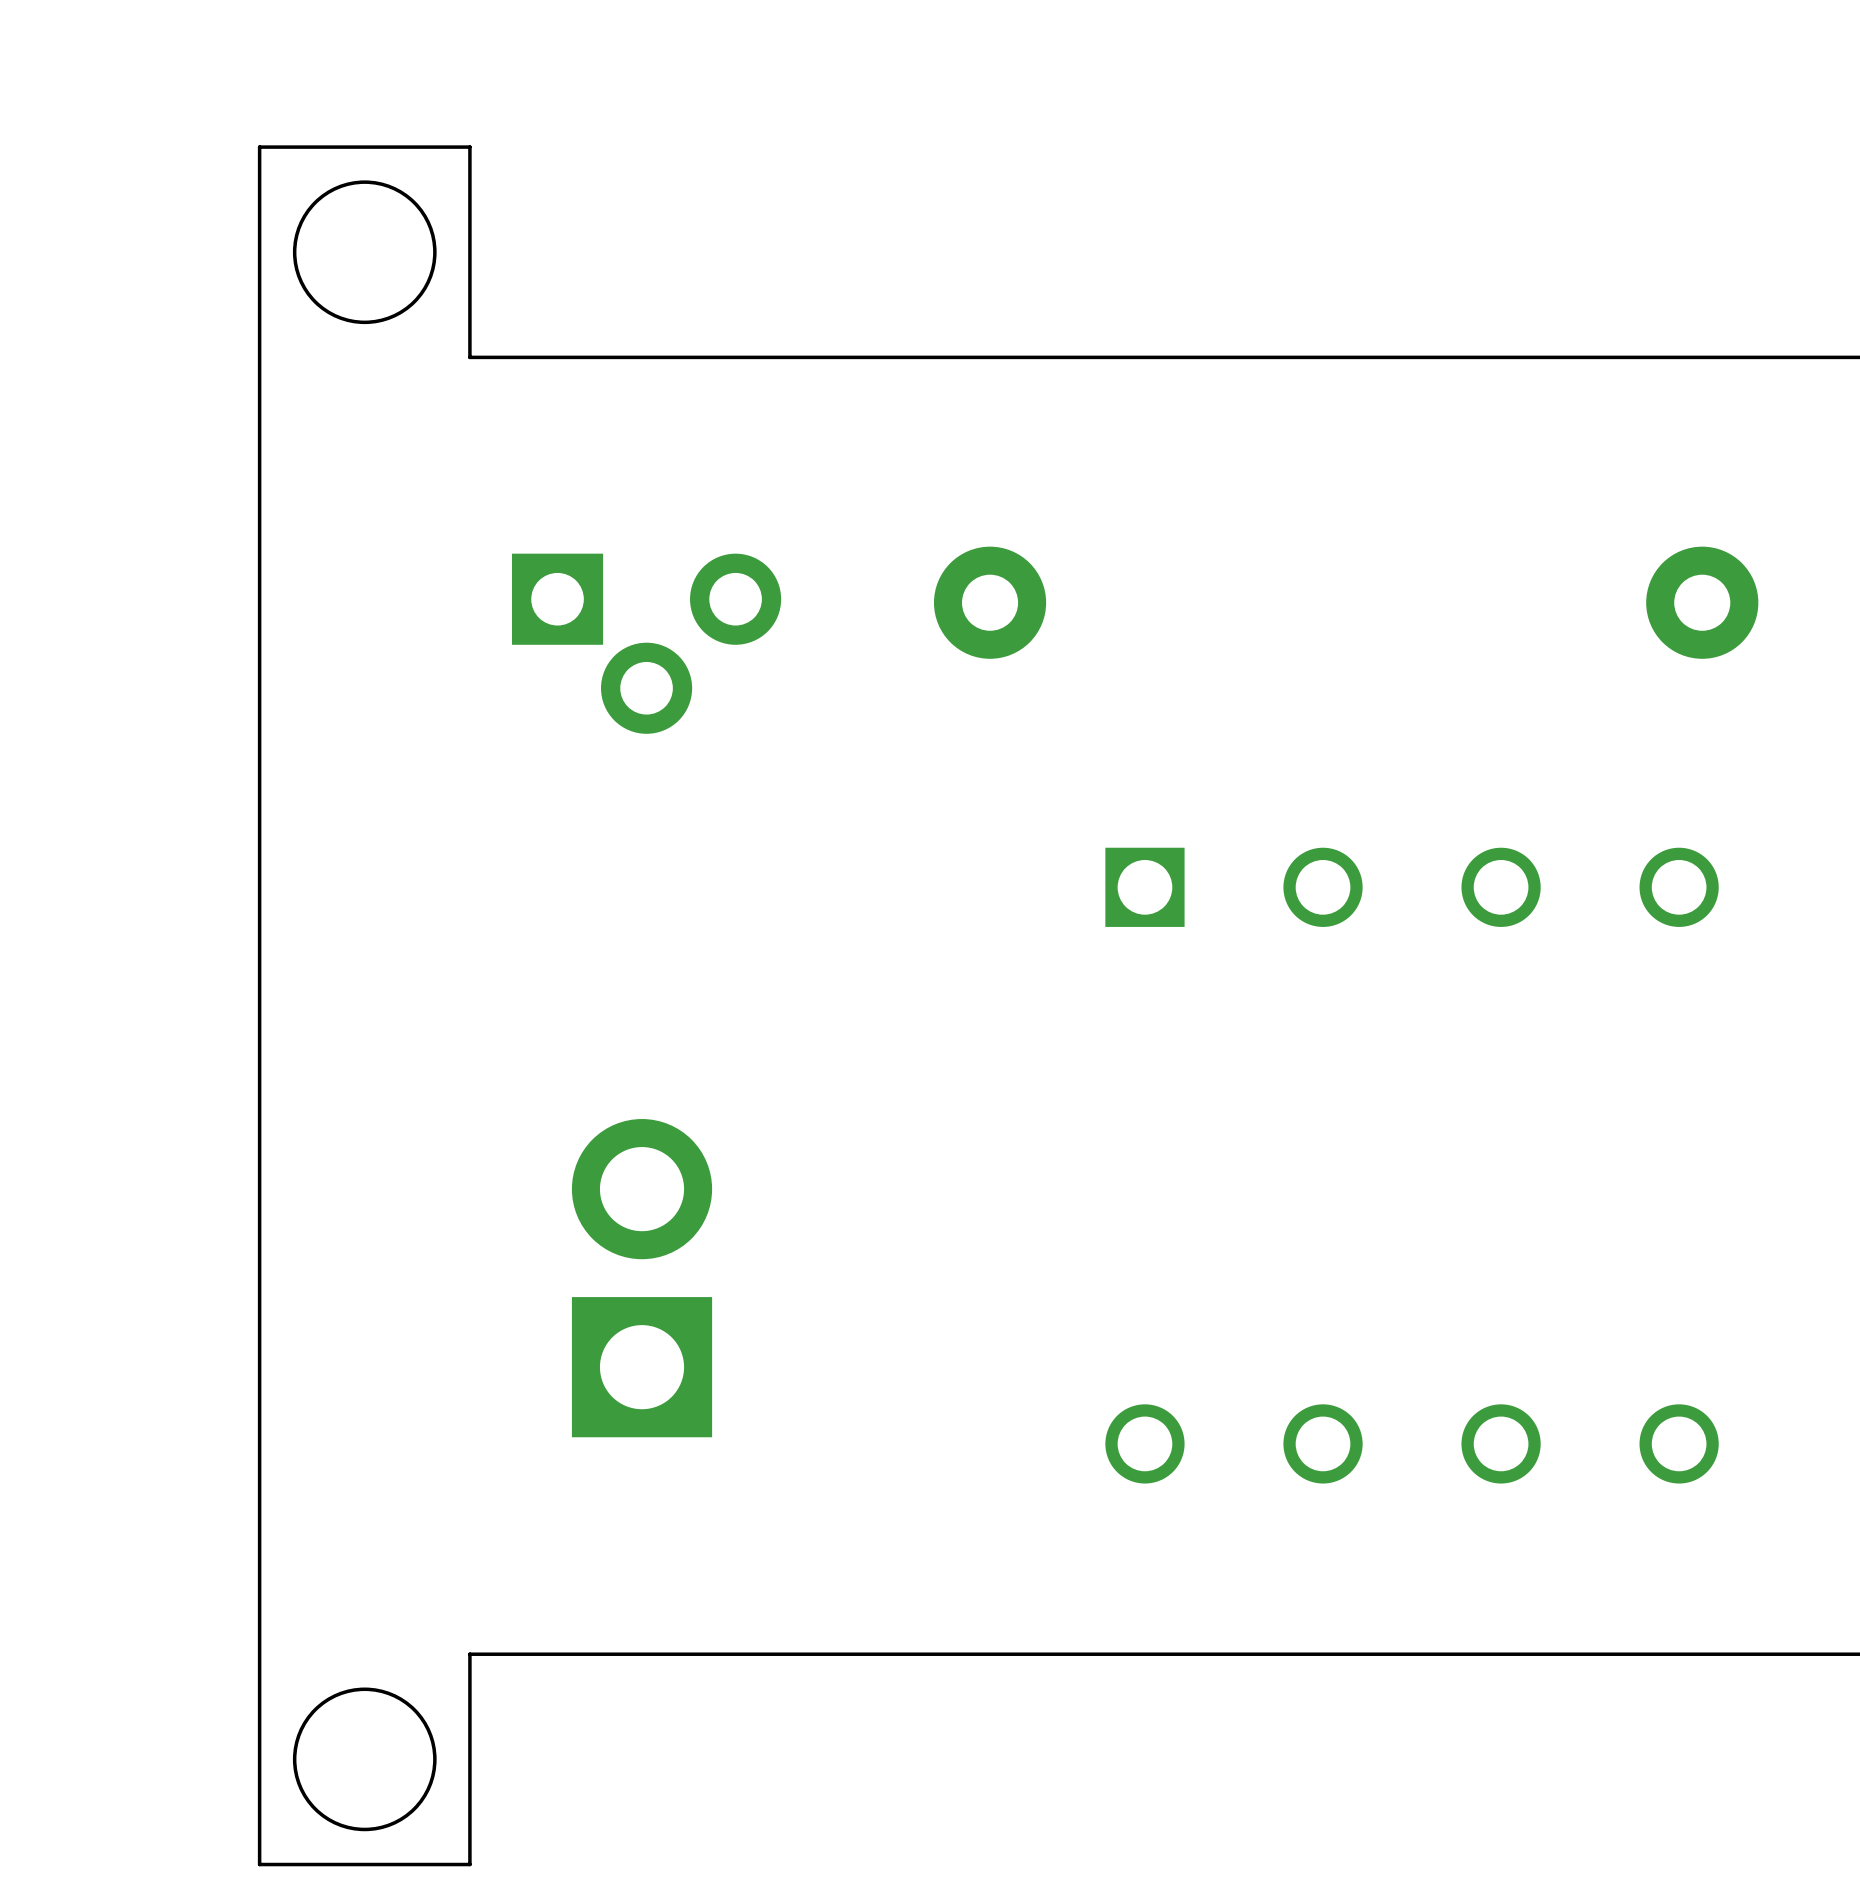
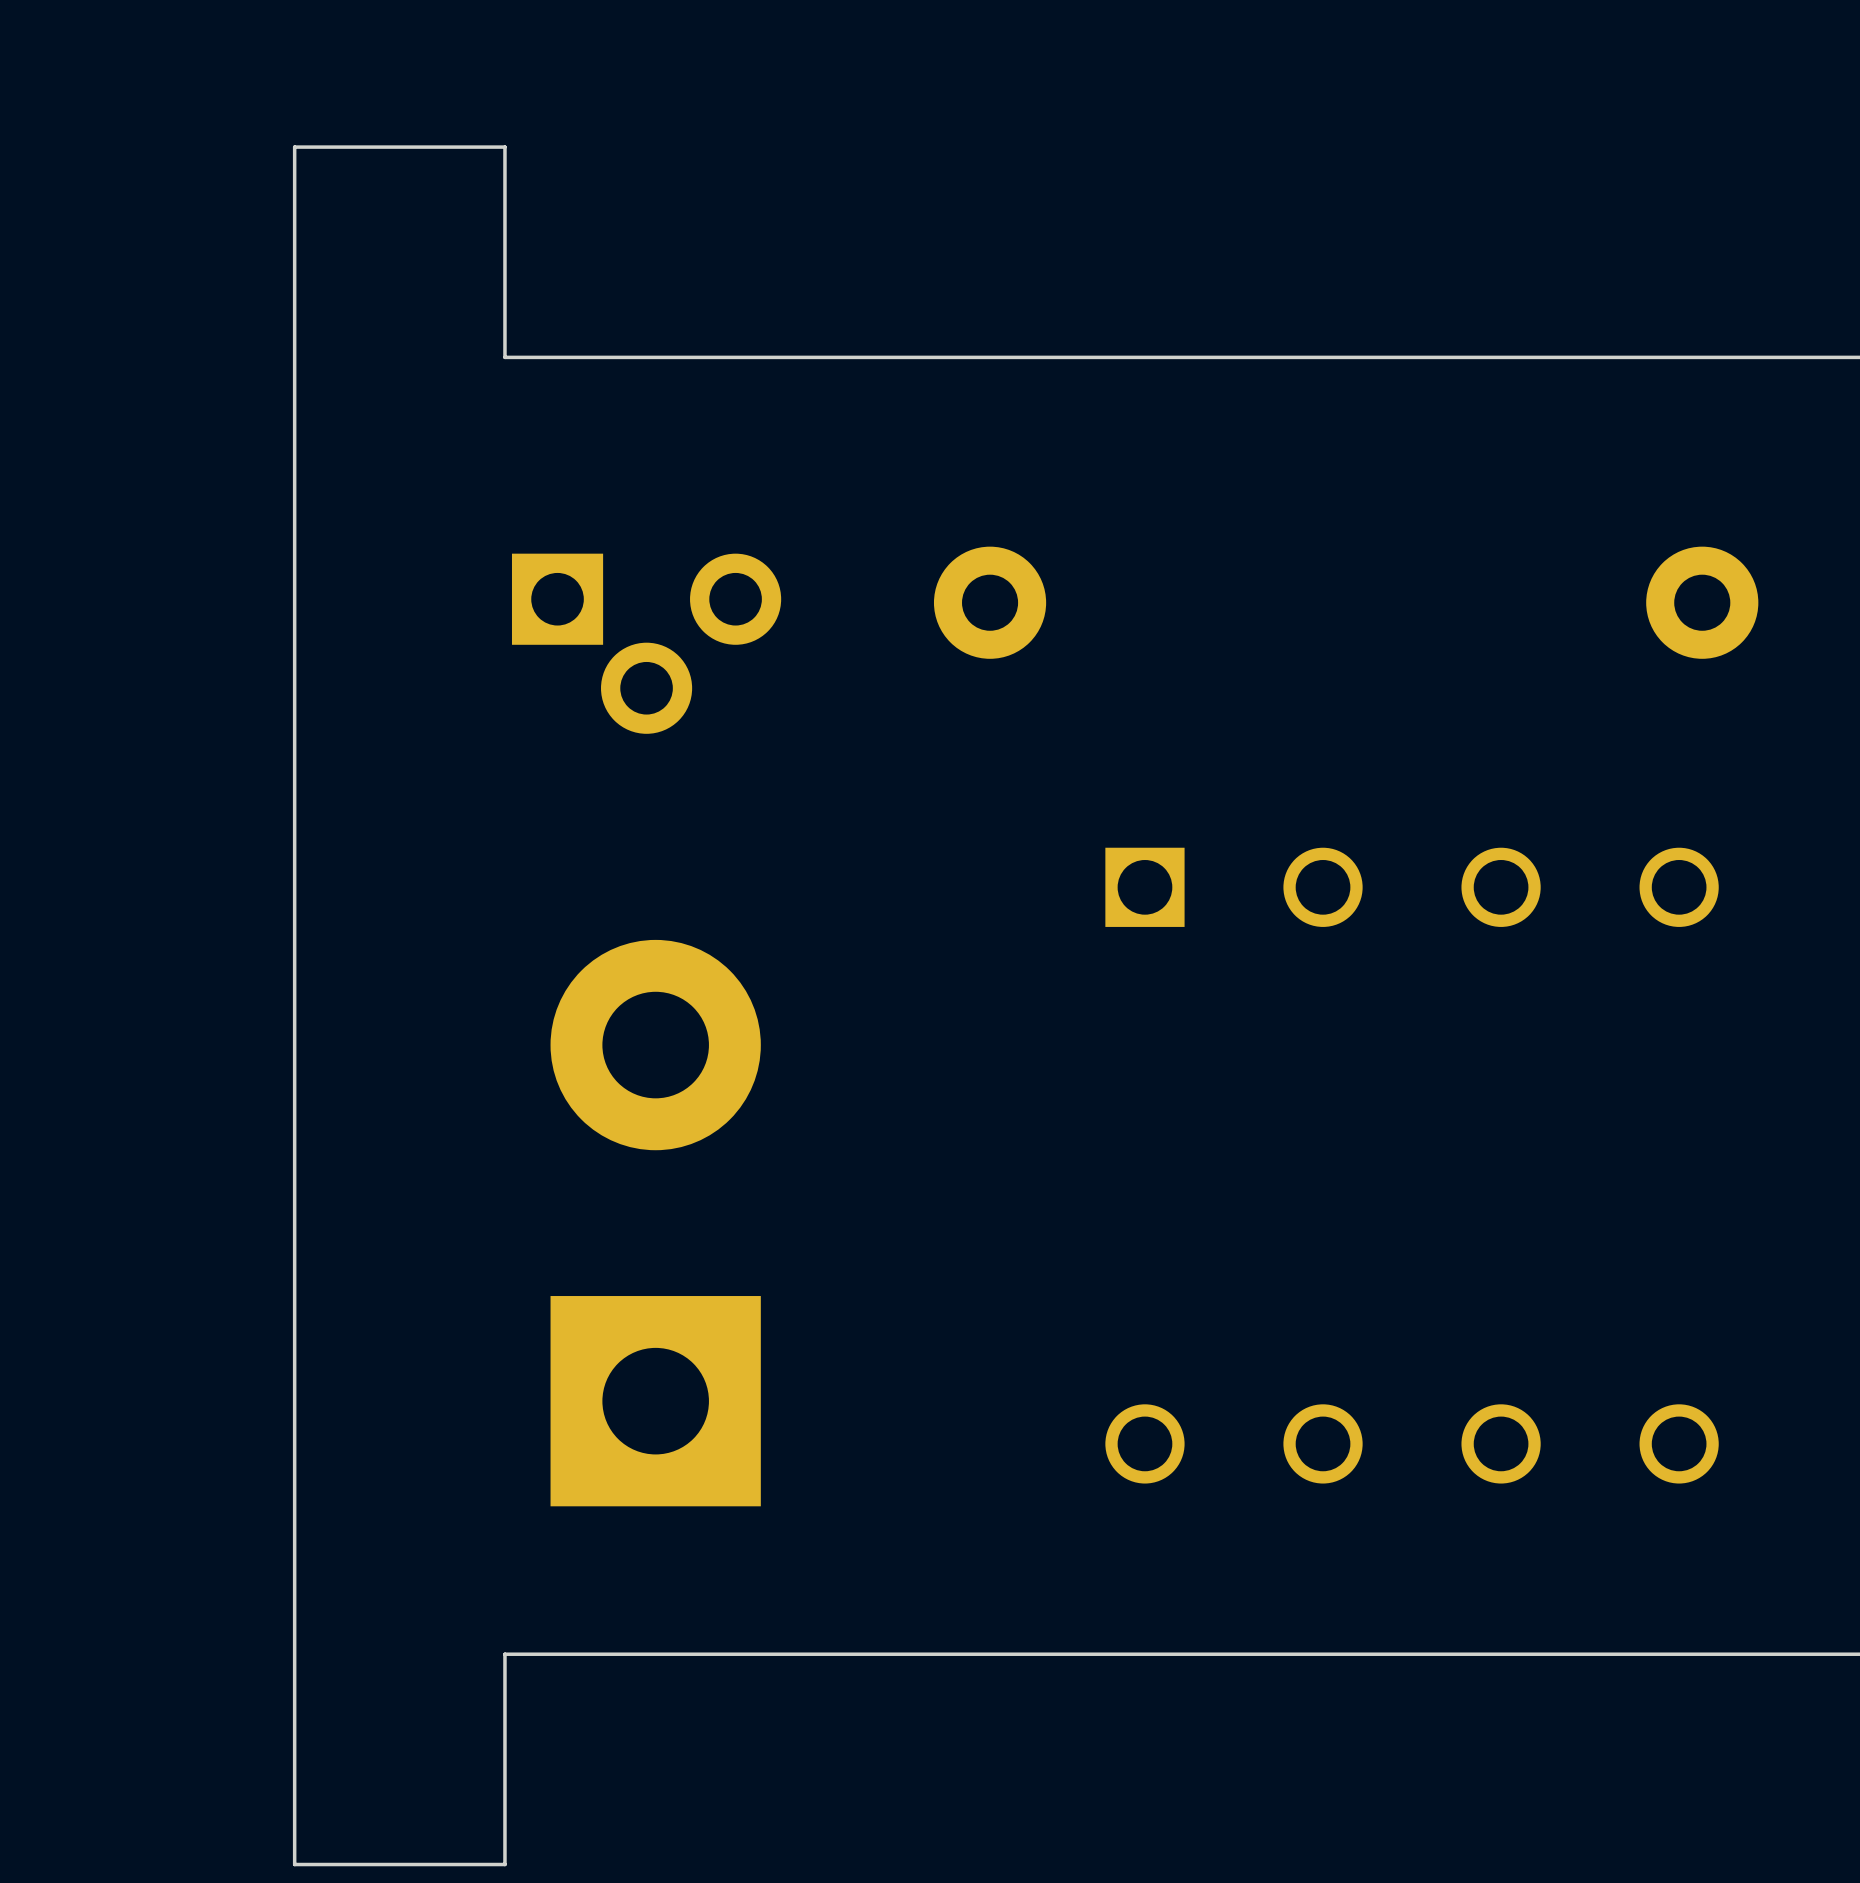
board edge: (294, 147) (259, 147) (259, 1864) (294, 1864) -> (294, 147) (294, 1864)
board edge: (469, 147) (469, 357) (504, 357) -> (469, 147) (504, 147) (504, 357)
round board edge: [292, 180, 437, 325] -> none
part footprint: [571, 1119, 713, 1438] -> [550, 939, 761, 1507]
board edge: (504, 1654) (469, 1654) (469, 1864) -> (504, 1654) (504, 1864) (469, 1864)
round board edge: [292, 1687, 437, 1832] -> none

